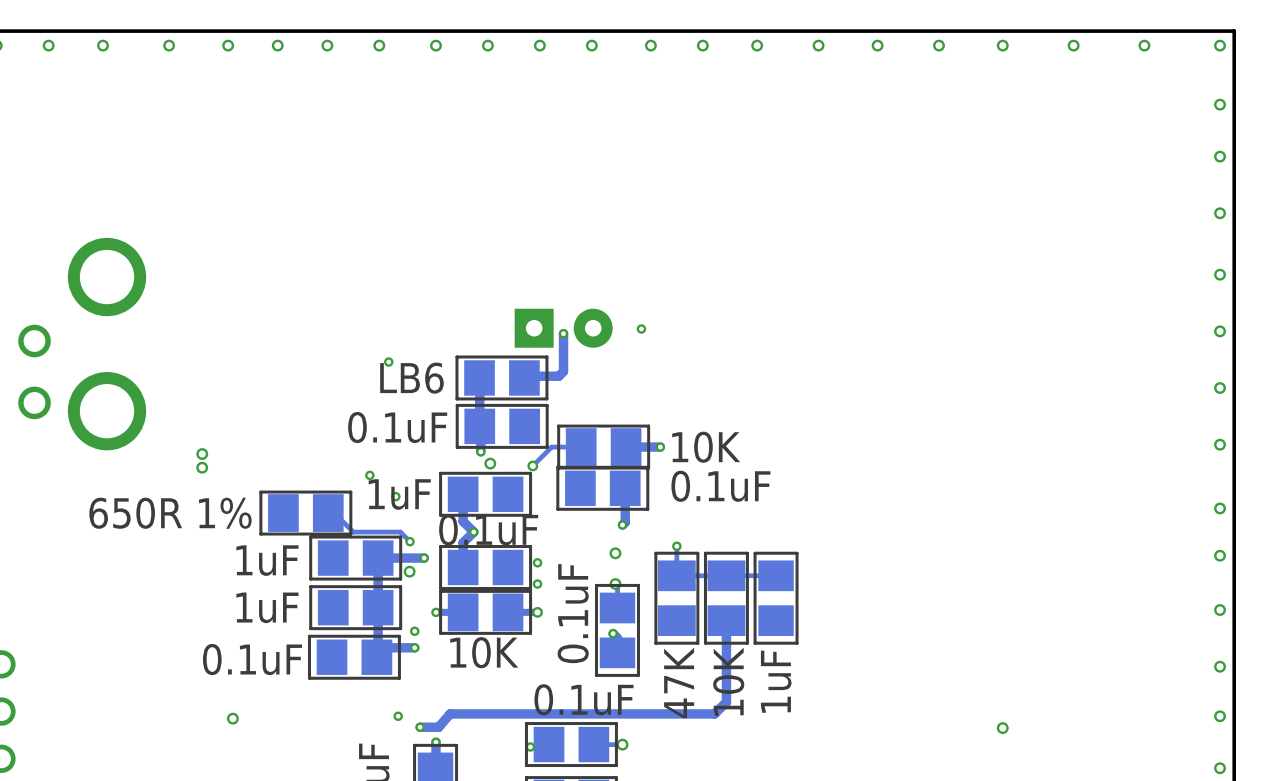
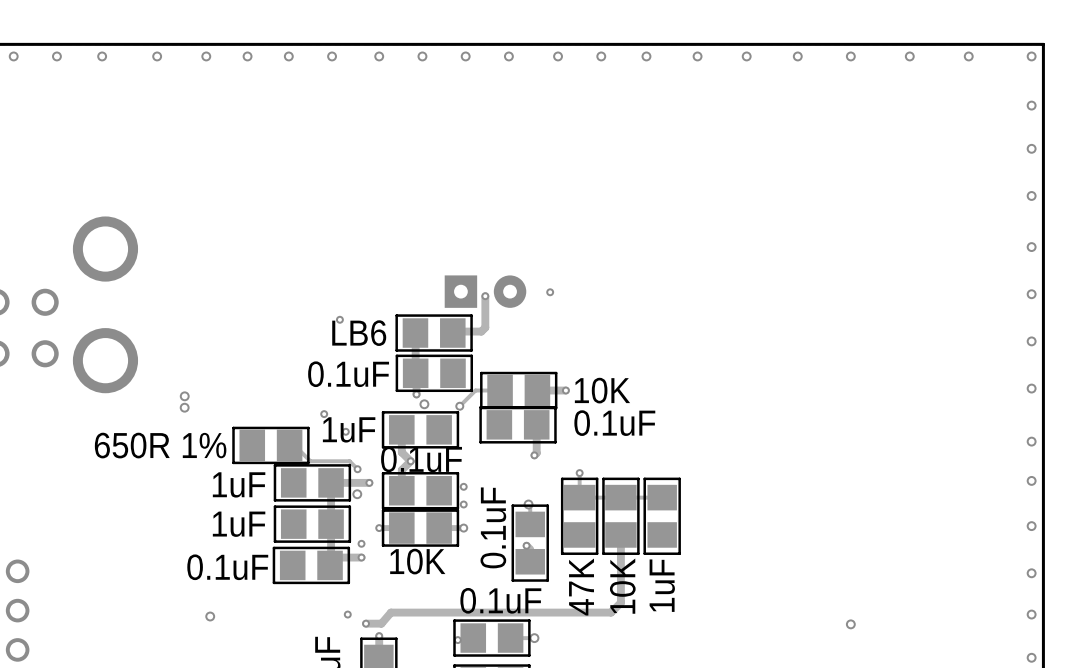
via: (615, 553) -> none

